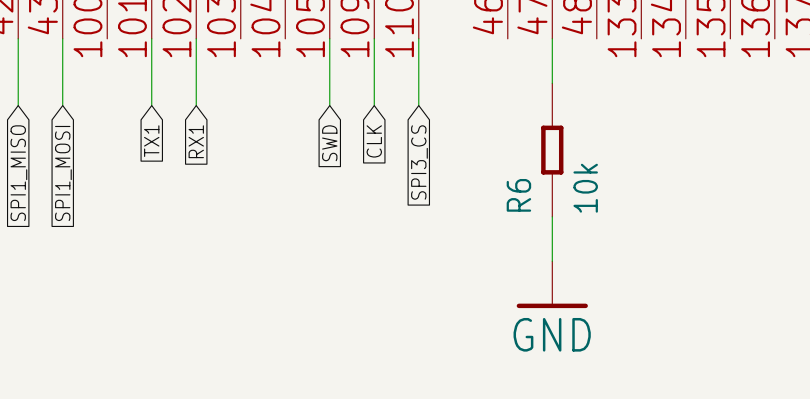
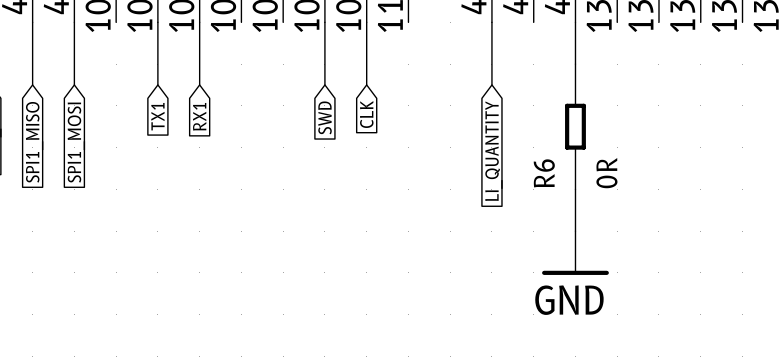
wire: (418, 38) (418, 105) -> (491, 22) (491, 84)
wire: (552, 38) (552, 83) -> (575, 22) (575, 64)
R6 position: (552, 150) -> (575, 126)
global label: SPI3_CS (419, 162) -> none
global label: none -> LI_QUANTITY (493, 151)
R6 value: 10k (585, 188) -> 0R (606, 173)
wire: (552, 216) (552, 261) -> (575, 189) (575, 231)
power symbol position: GND (552, 284) -> GND (575, 253)

